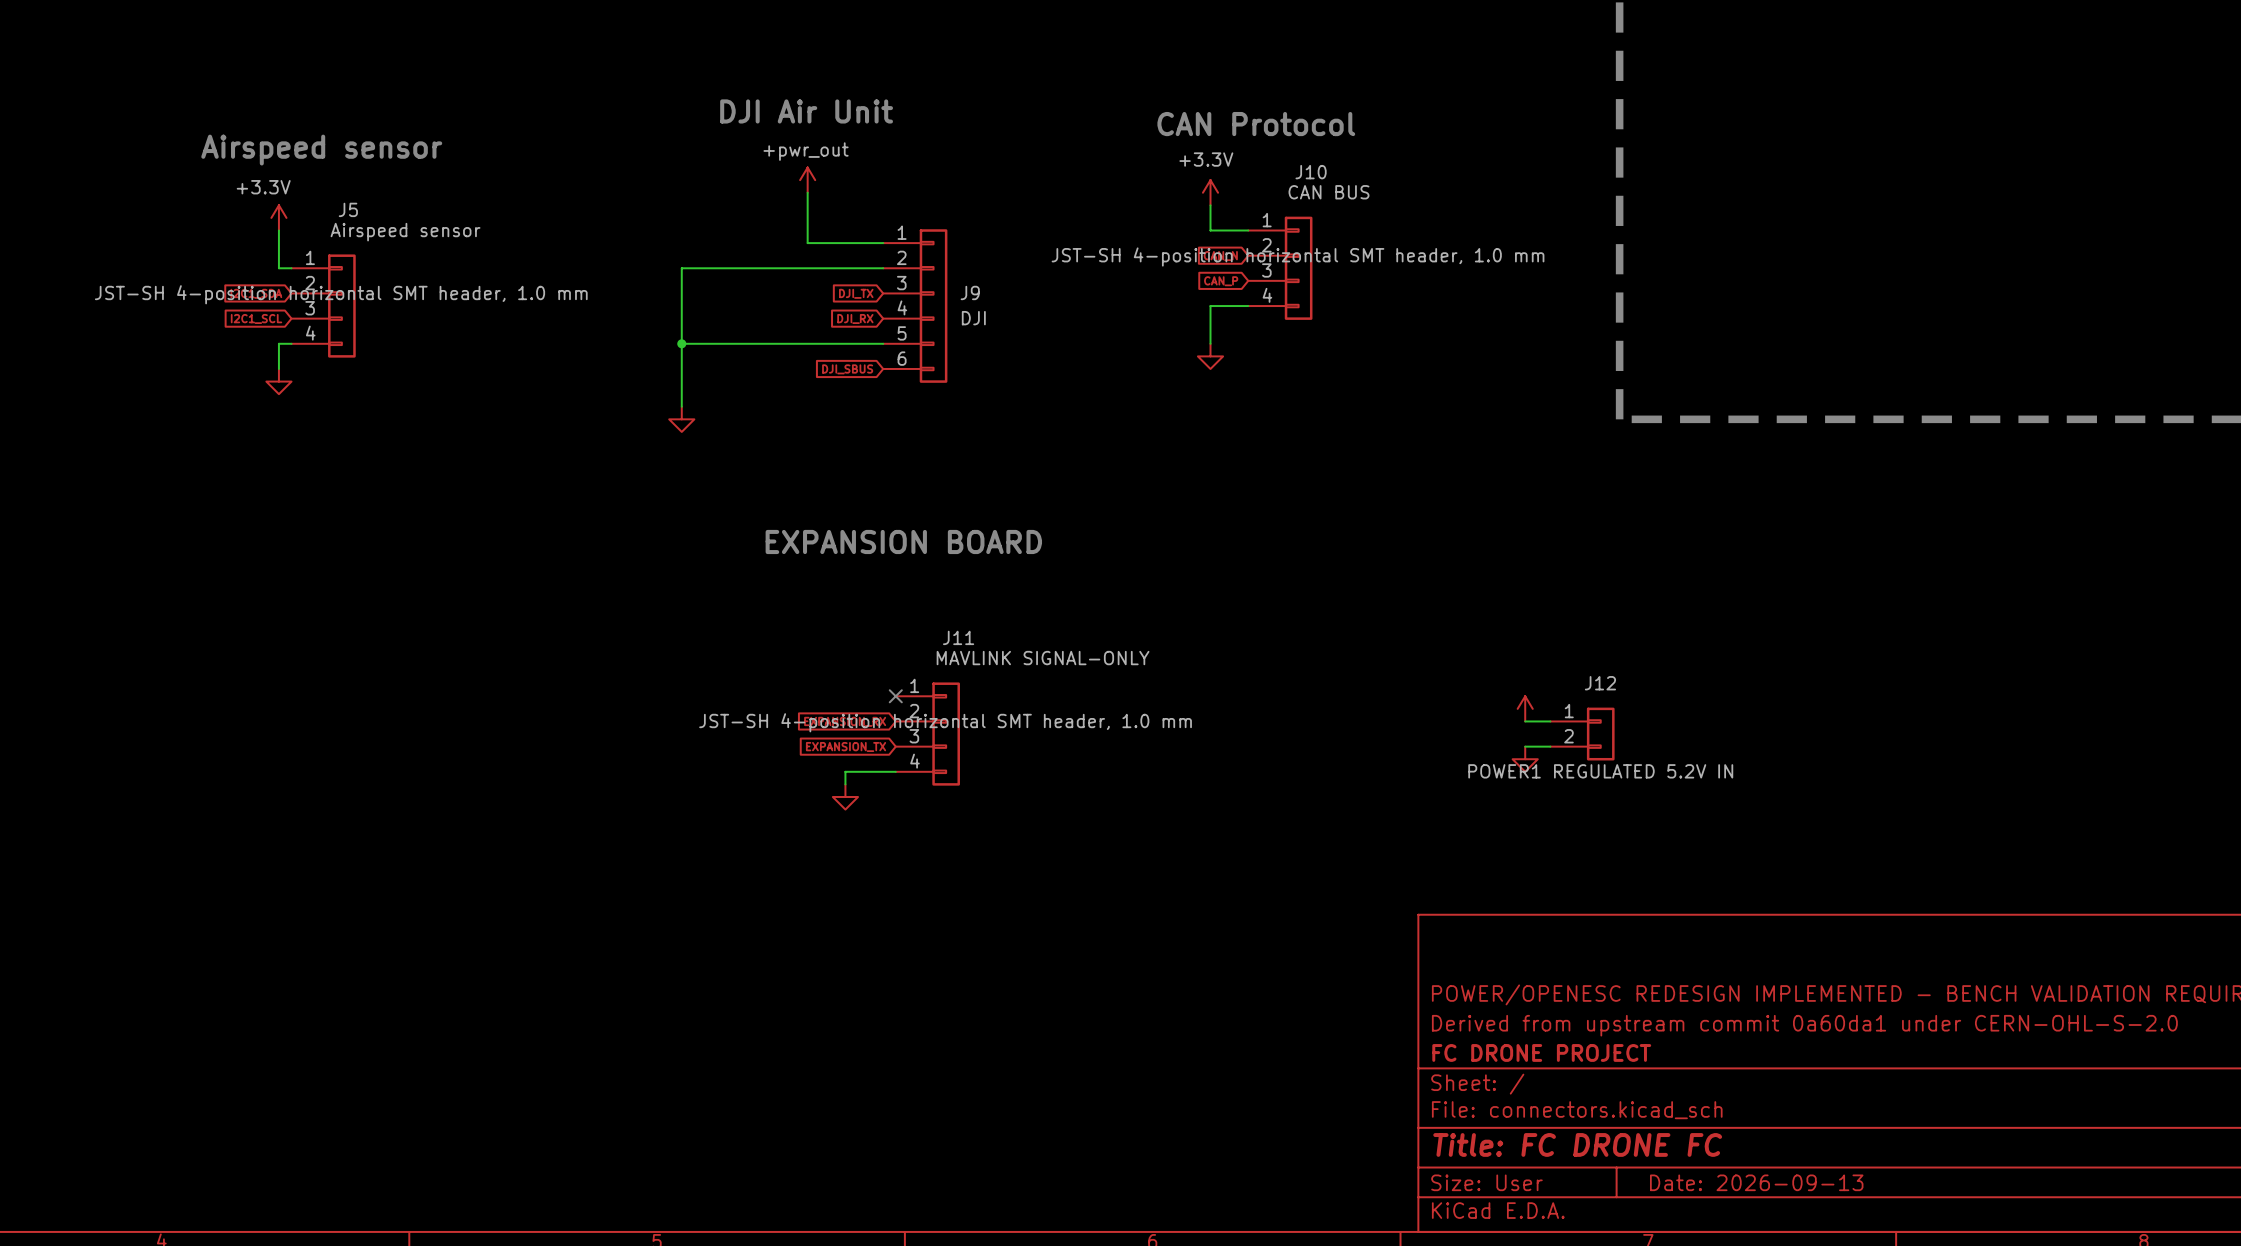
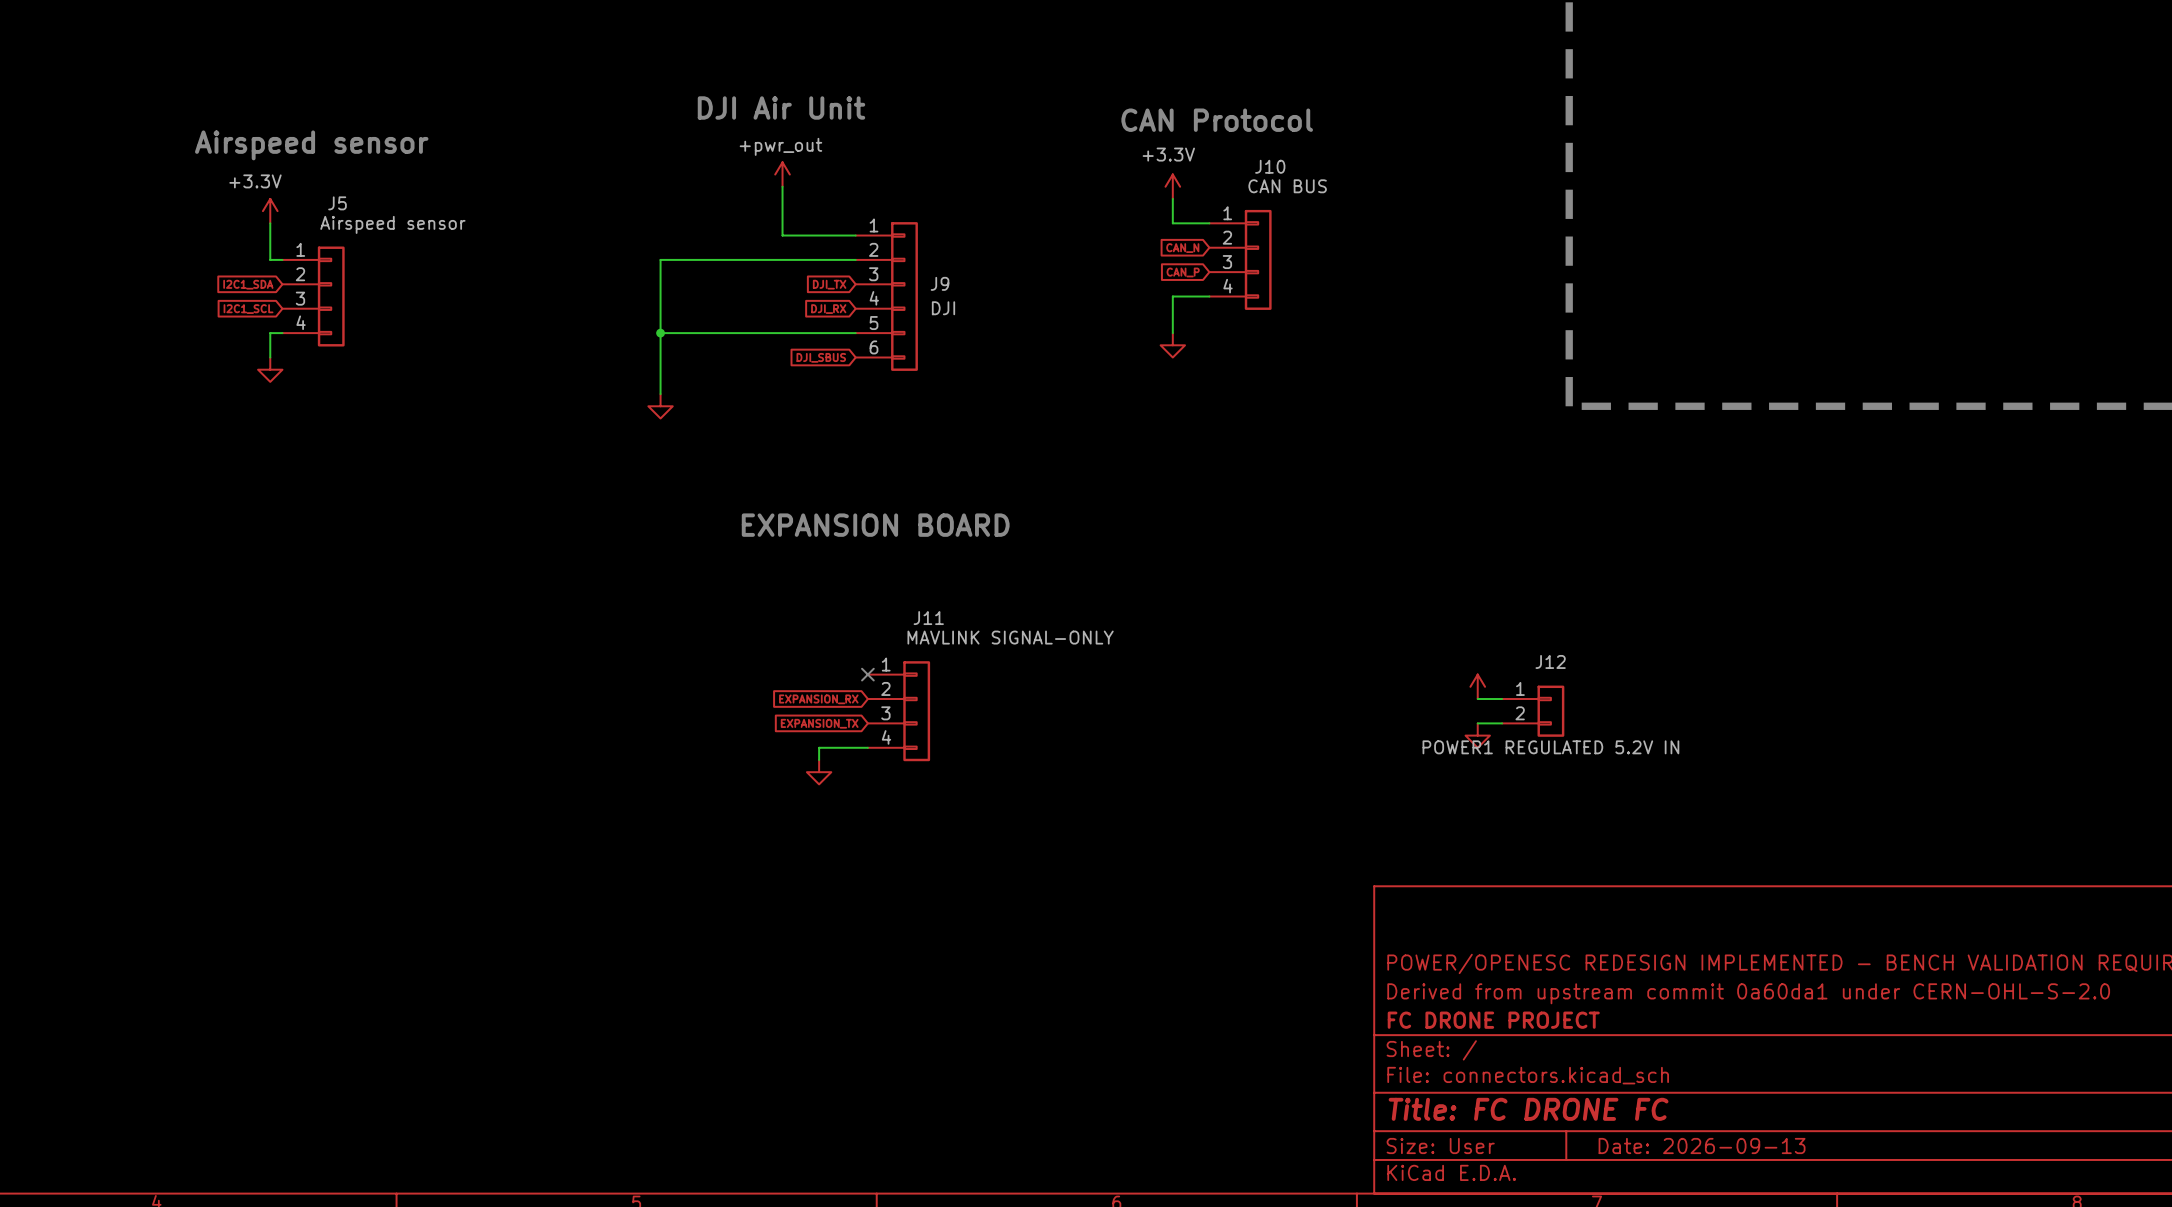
J10 text: JST-SH 4-position horizontal SMT header, 1.0 mm (1298, 257) -> none
J5 text: JST-SH 4-position horizontal SMT header, 1.0 mm (341, 294) -> none
J11 text: JST-SH 4-position horizontal SMT header, 1.0 mm (945, 722) -> none

